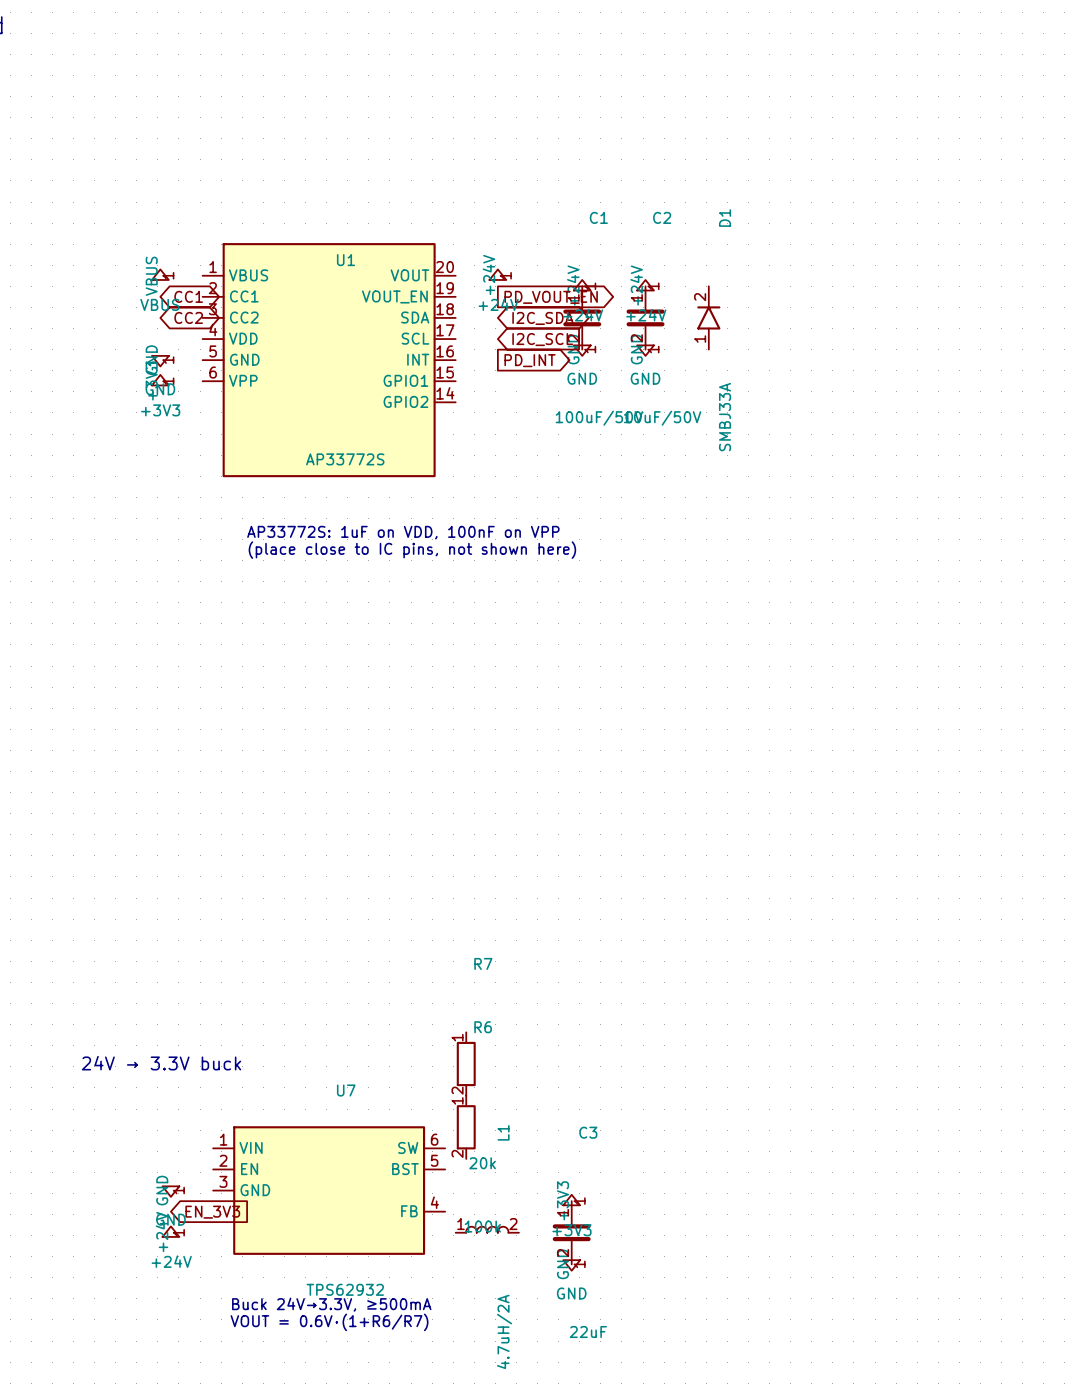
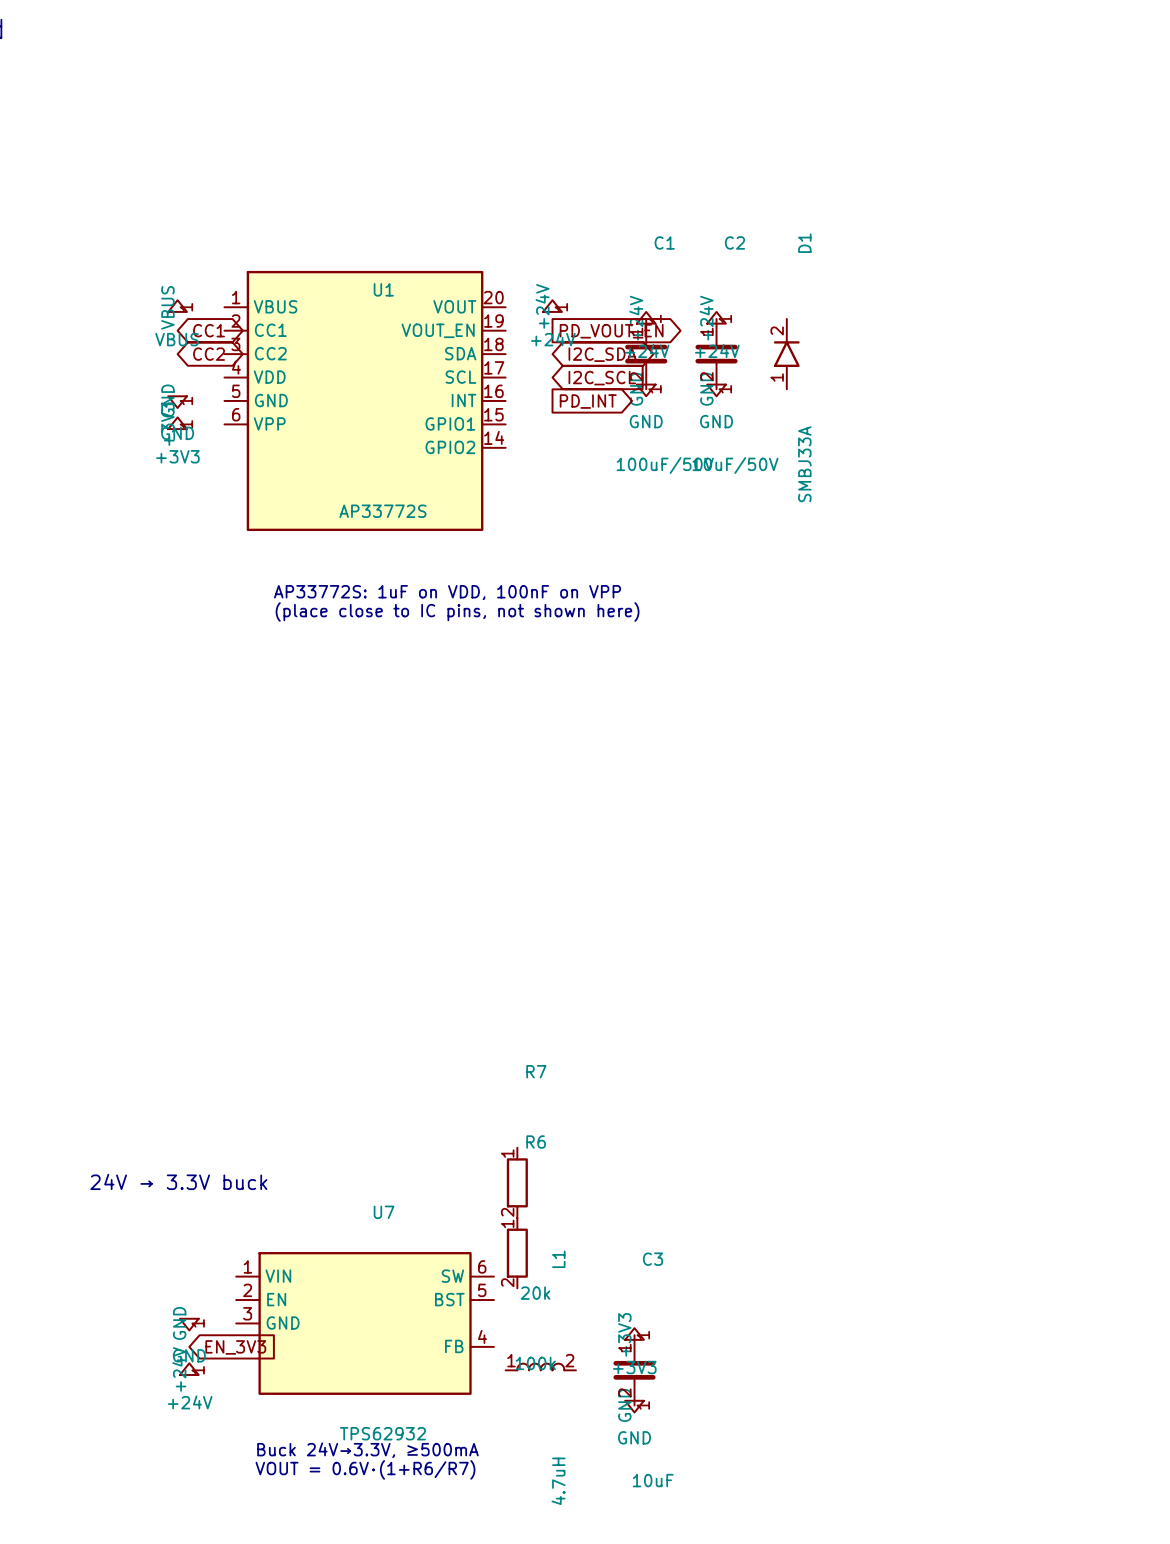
L1 value: 4.7uH/2A (504, 1331) -> 4.7uH (558, 1481)
C3 value: 22uF (588, 1332) -> 10uF (653, 1480)

